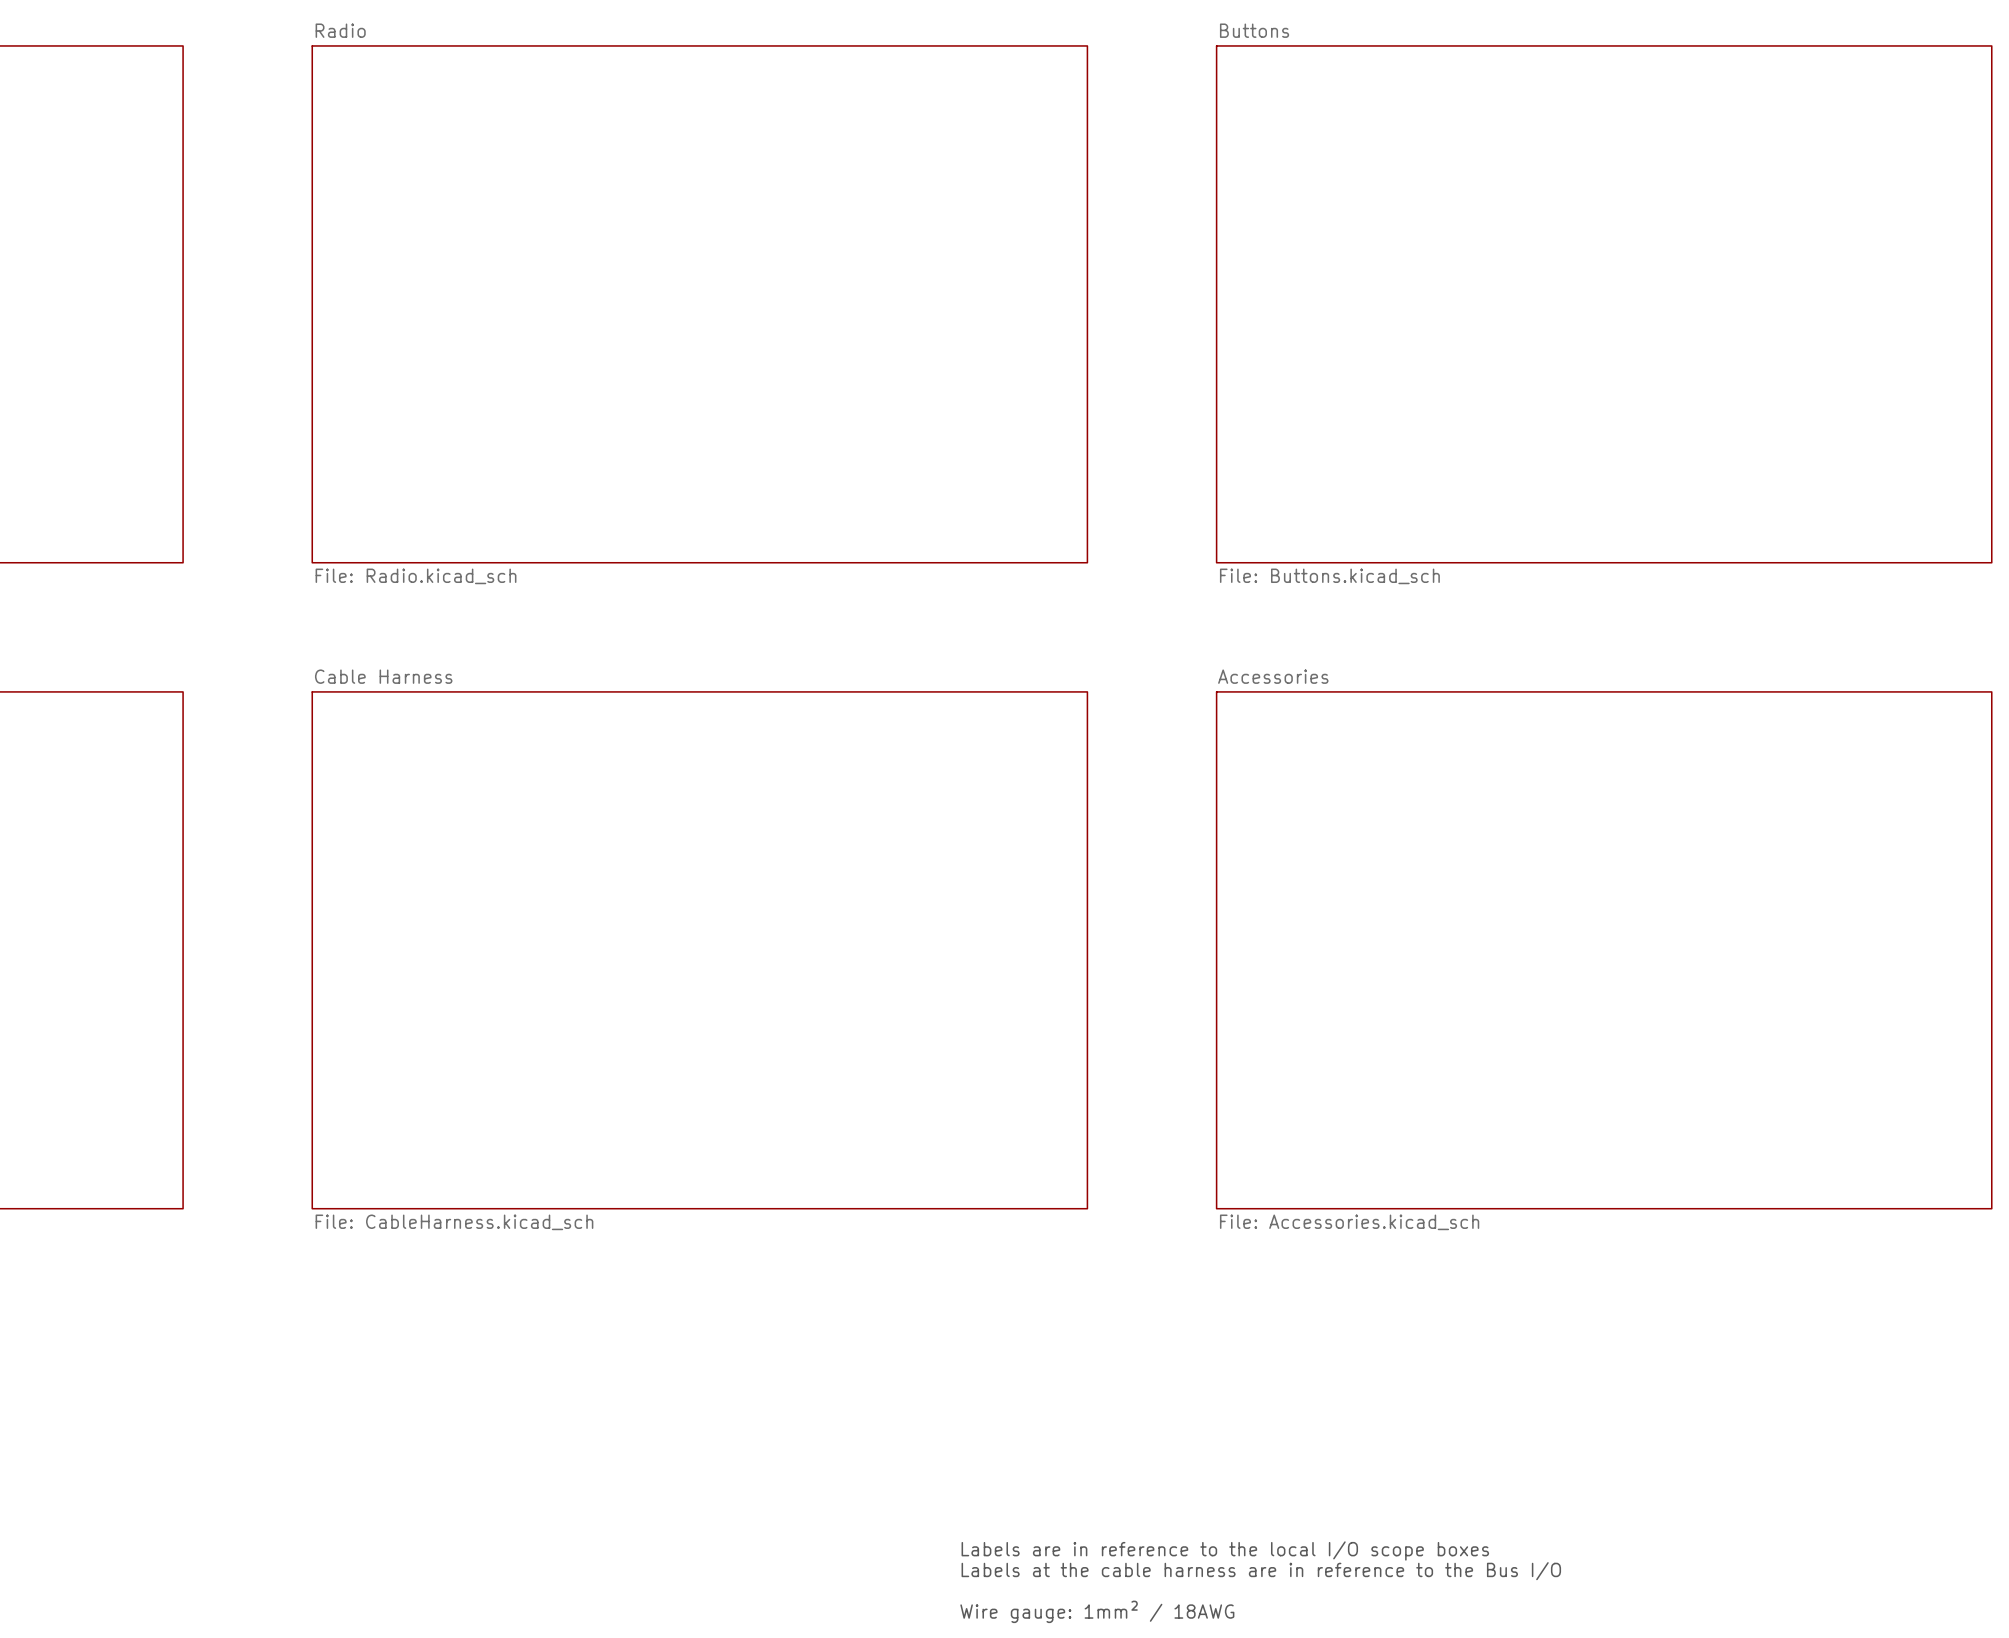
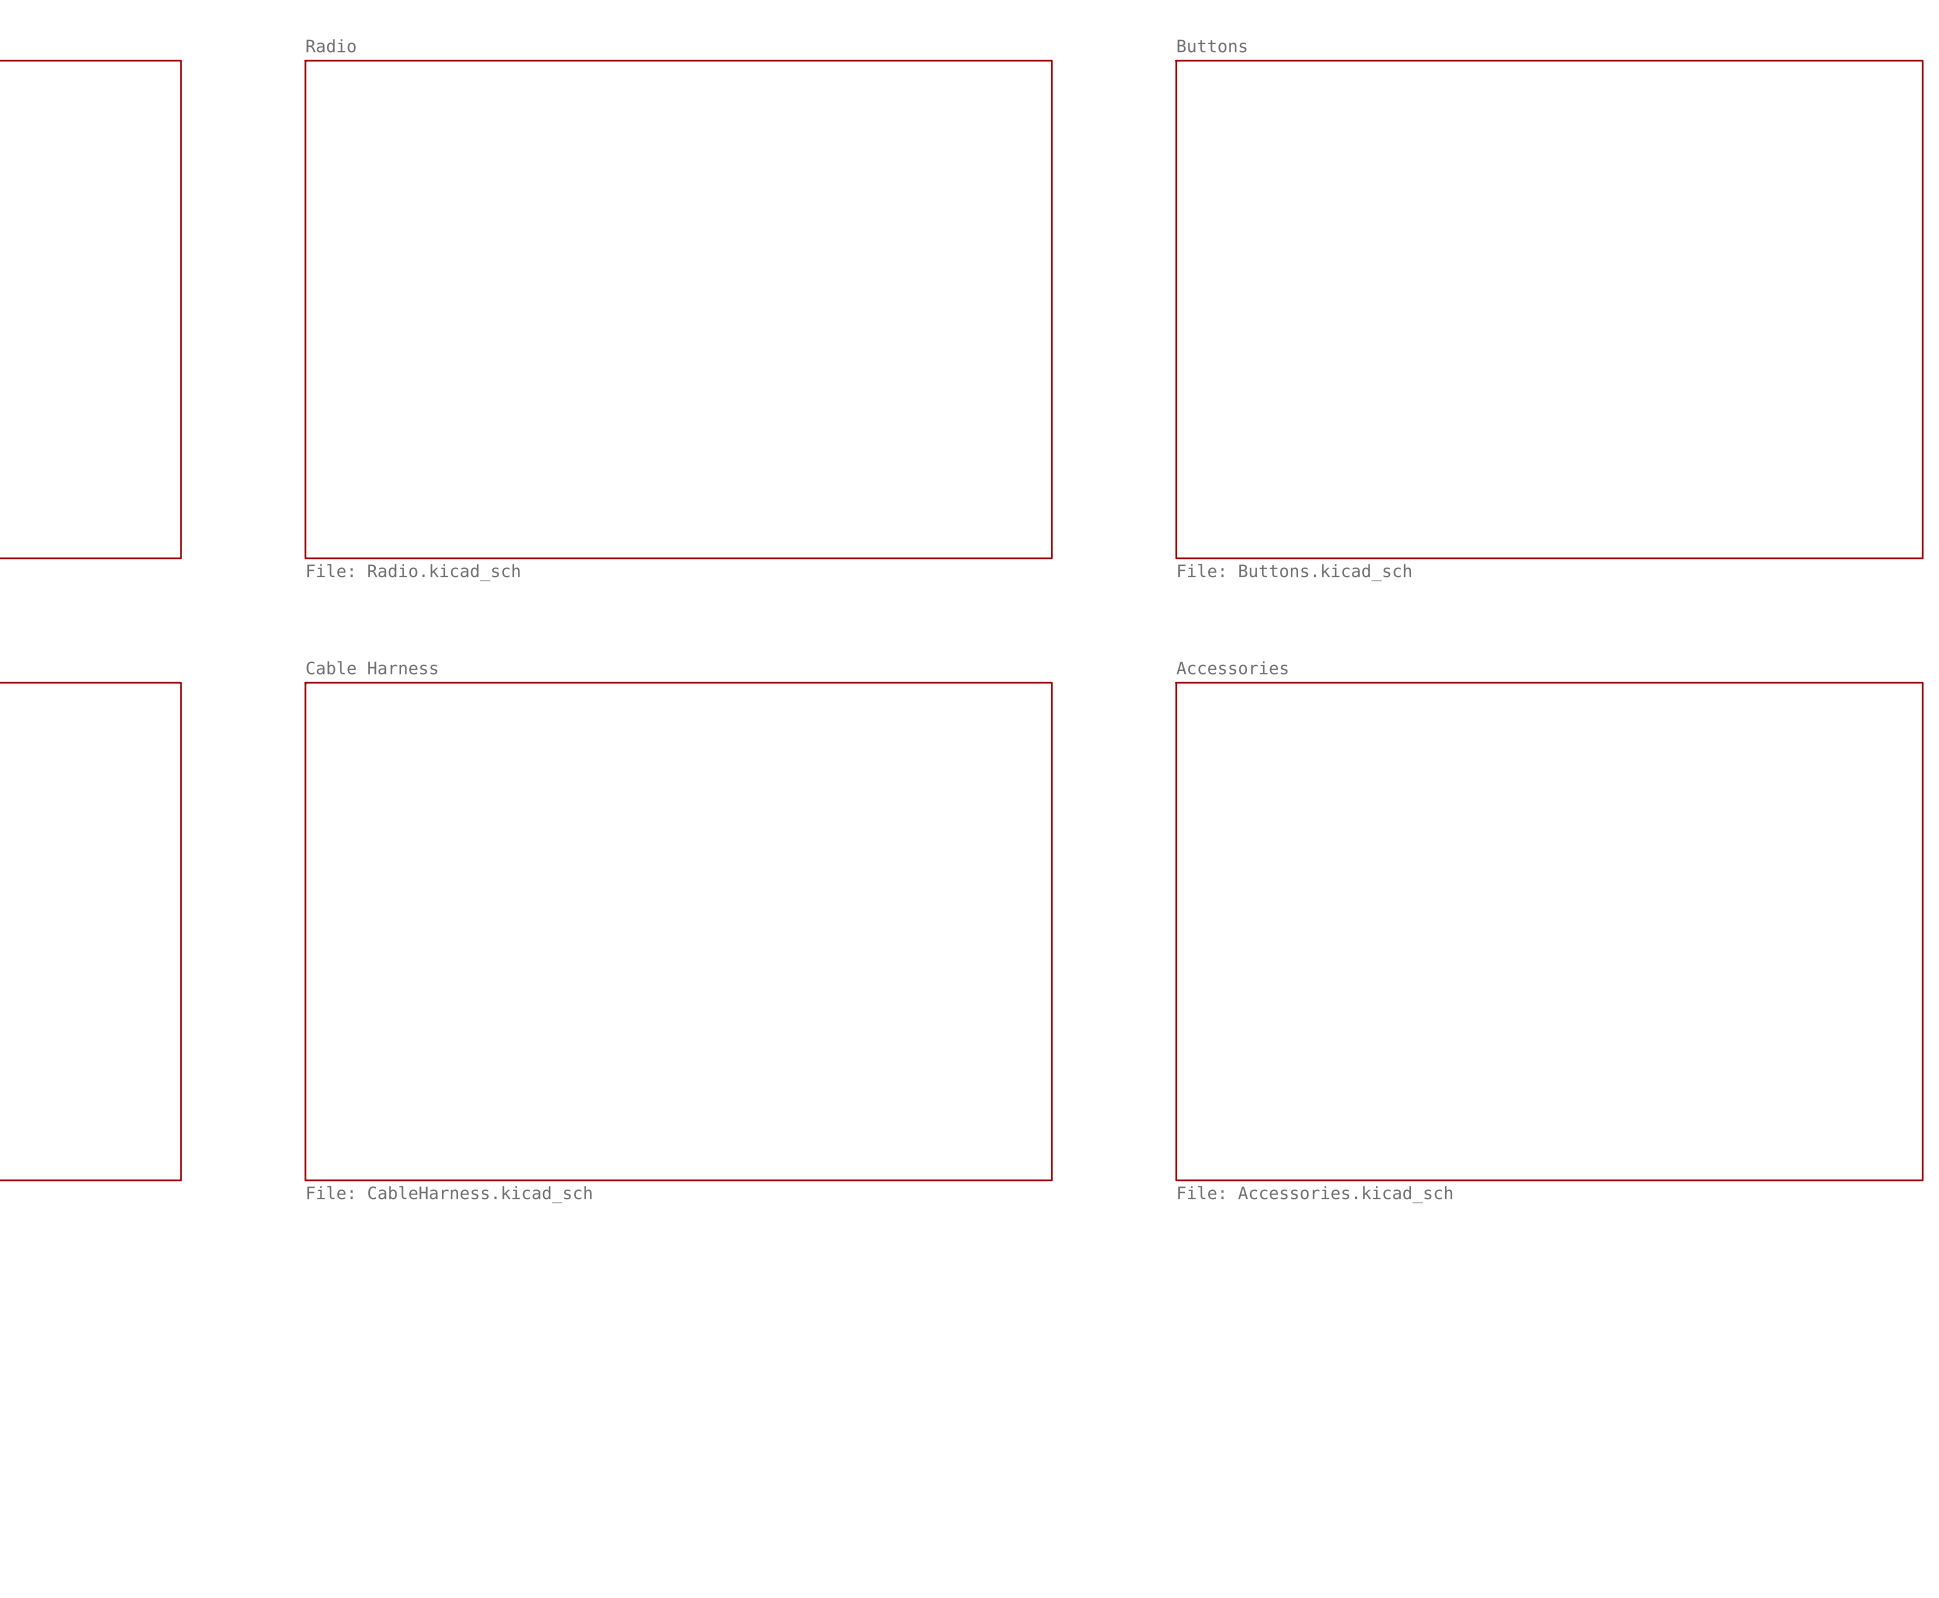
text: Labels are in reference to the local I/O scope boxes (1225, 1550) -> none
text: Labels at the cable harness are in reference to the Bus I/O (1261, 1571) -> none
text: Wire gauge: 1mm² / 18AWG (1097, 1611) -> none

